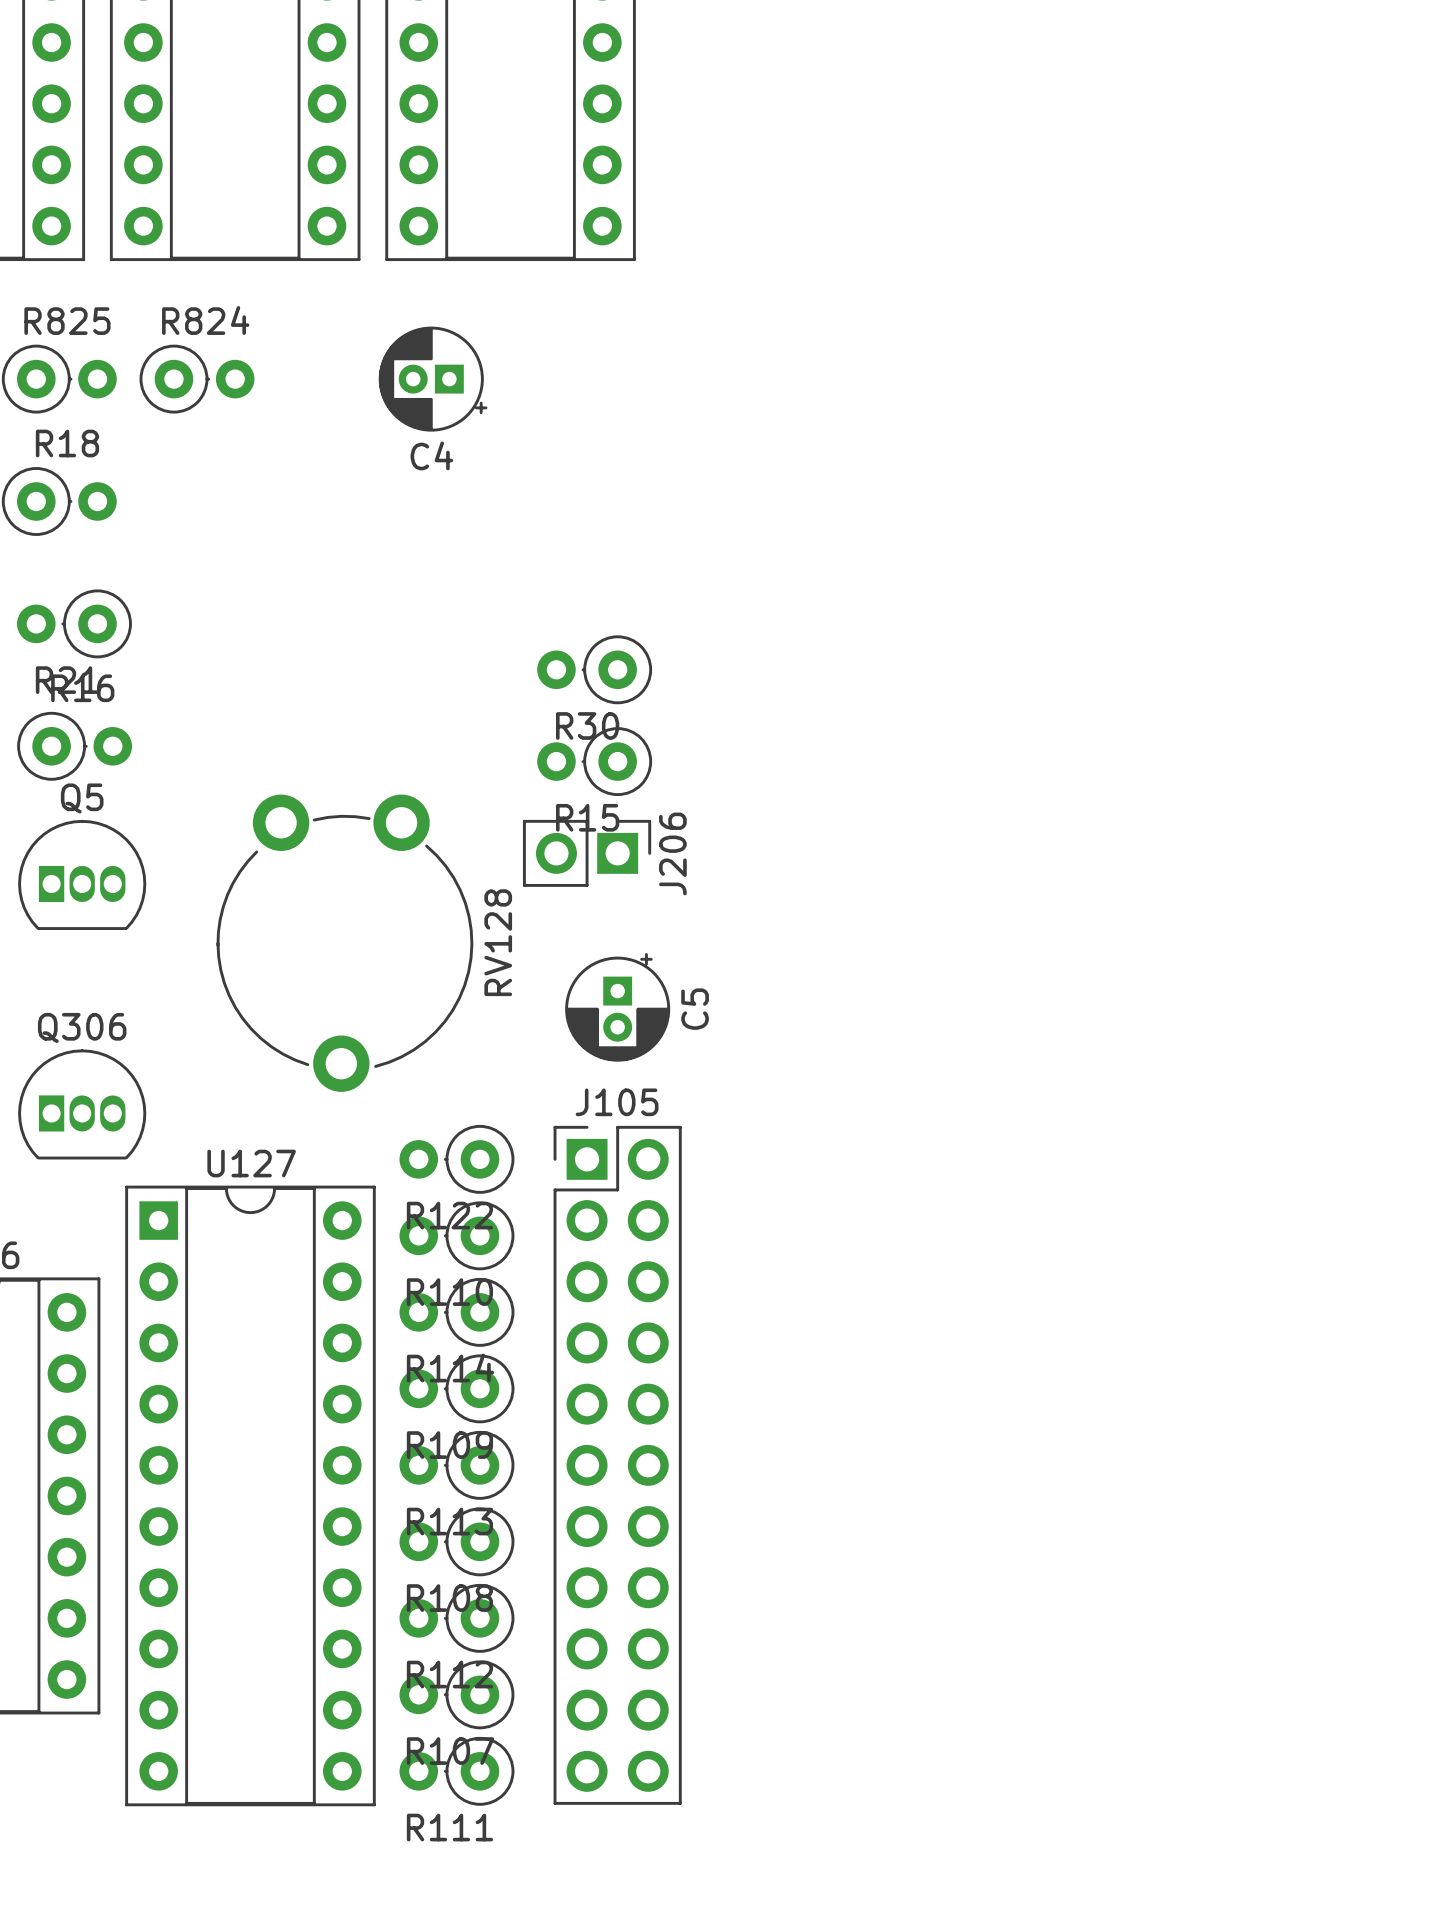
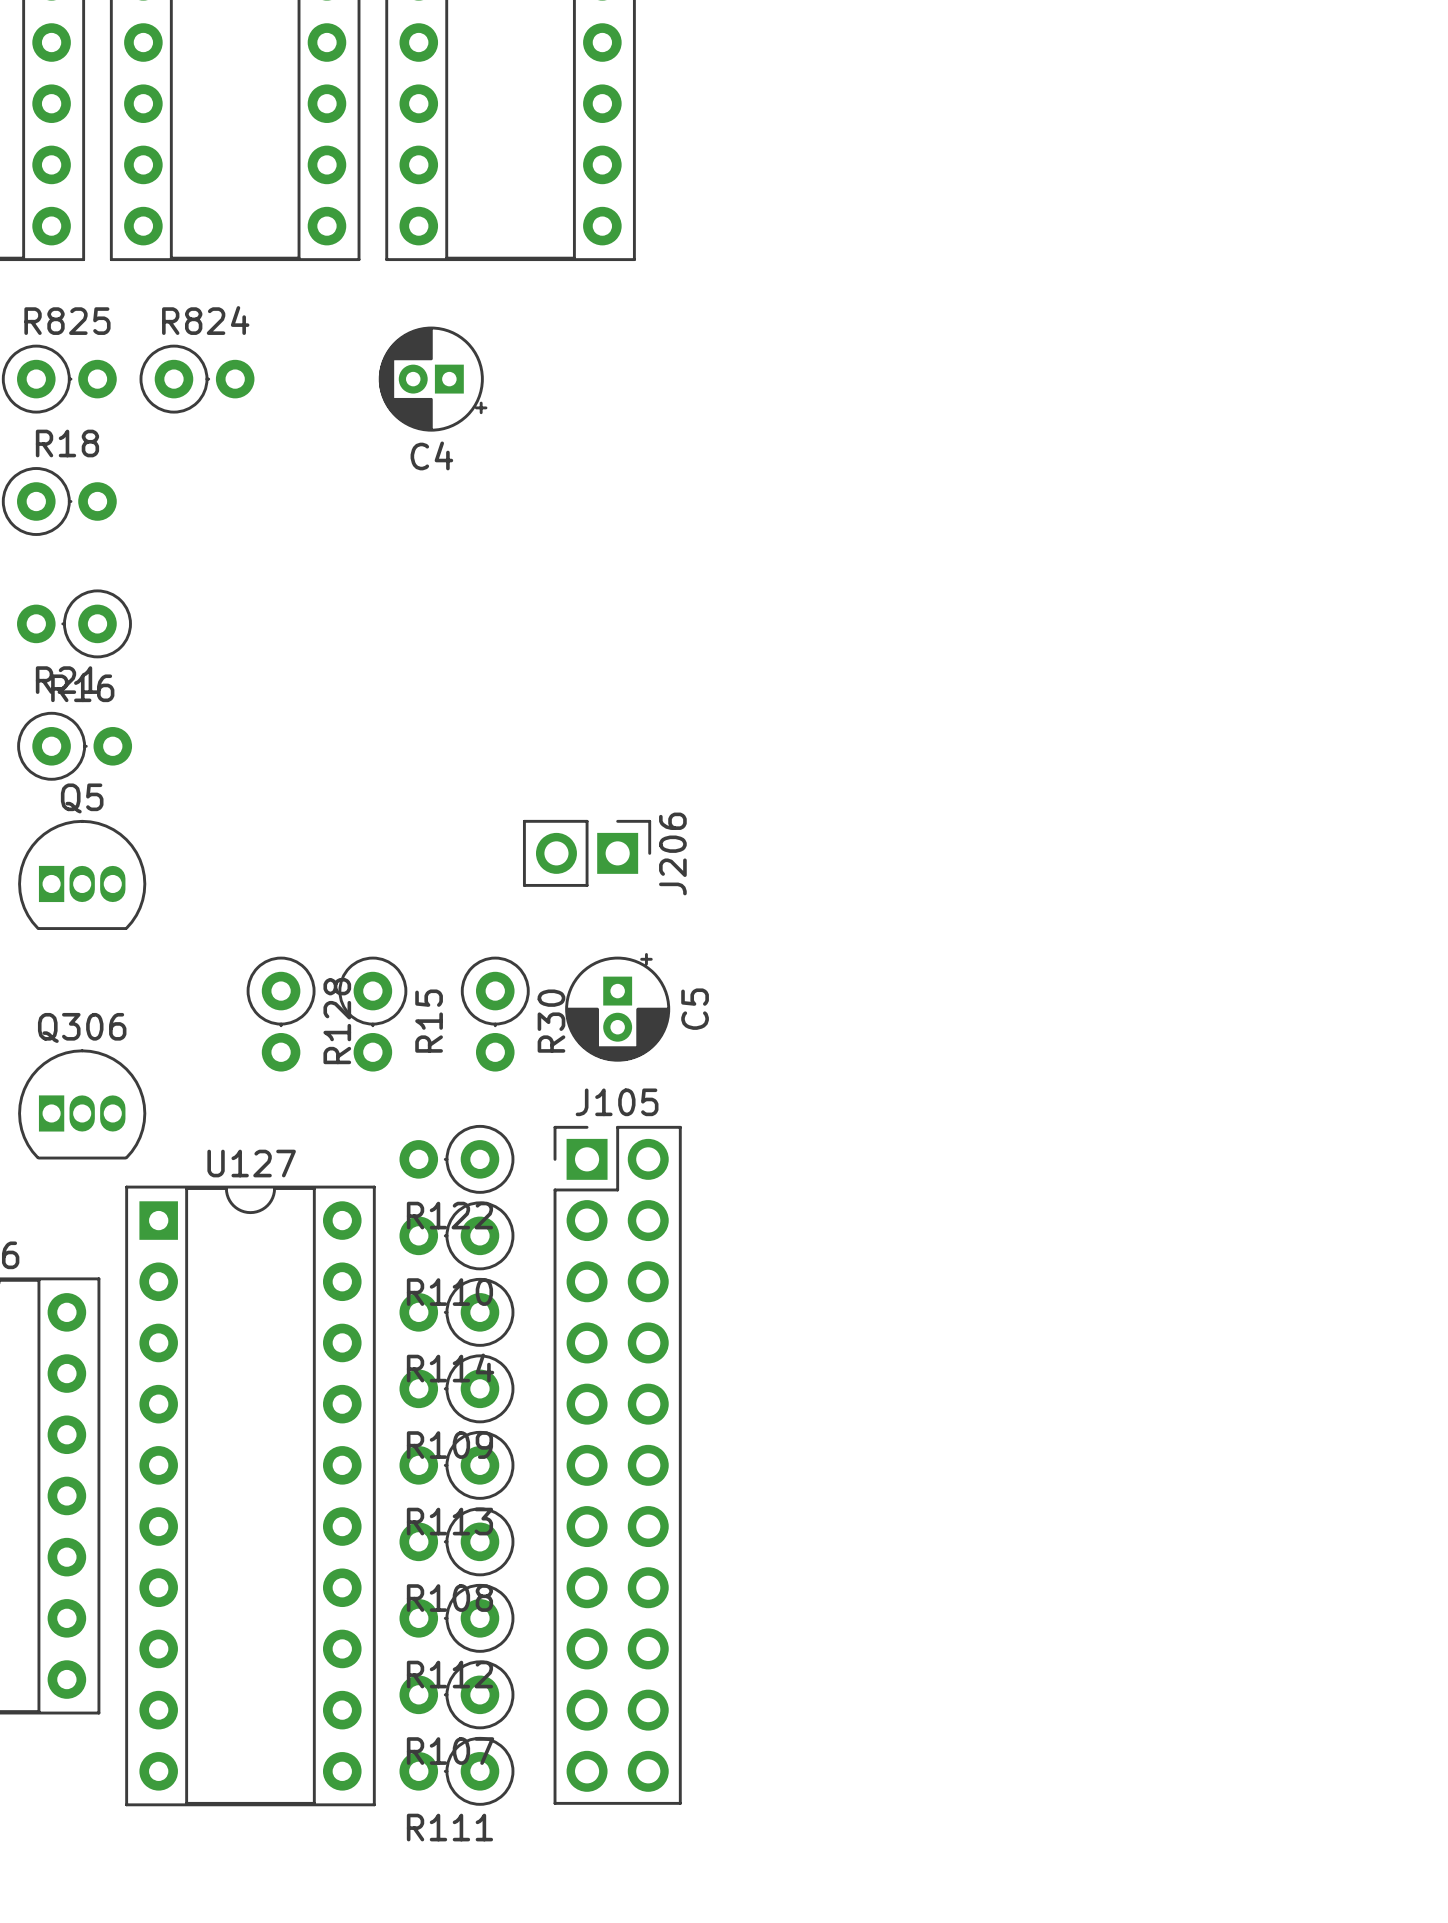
R30 rotation: 0° (594, 669) -> 90° counterclockwise (495, 1014)
R30 position: (594, 669) -> (495, 1014)
R15 rotation: 0° (594, 761) -> 90° counterclockwise (372, 1014)
R15 position: (594, 761) -> (372, 1014)
RV128: (344, 943) -> none
R128: none -> (281, 1014)

